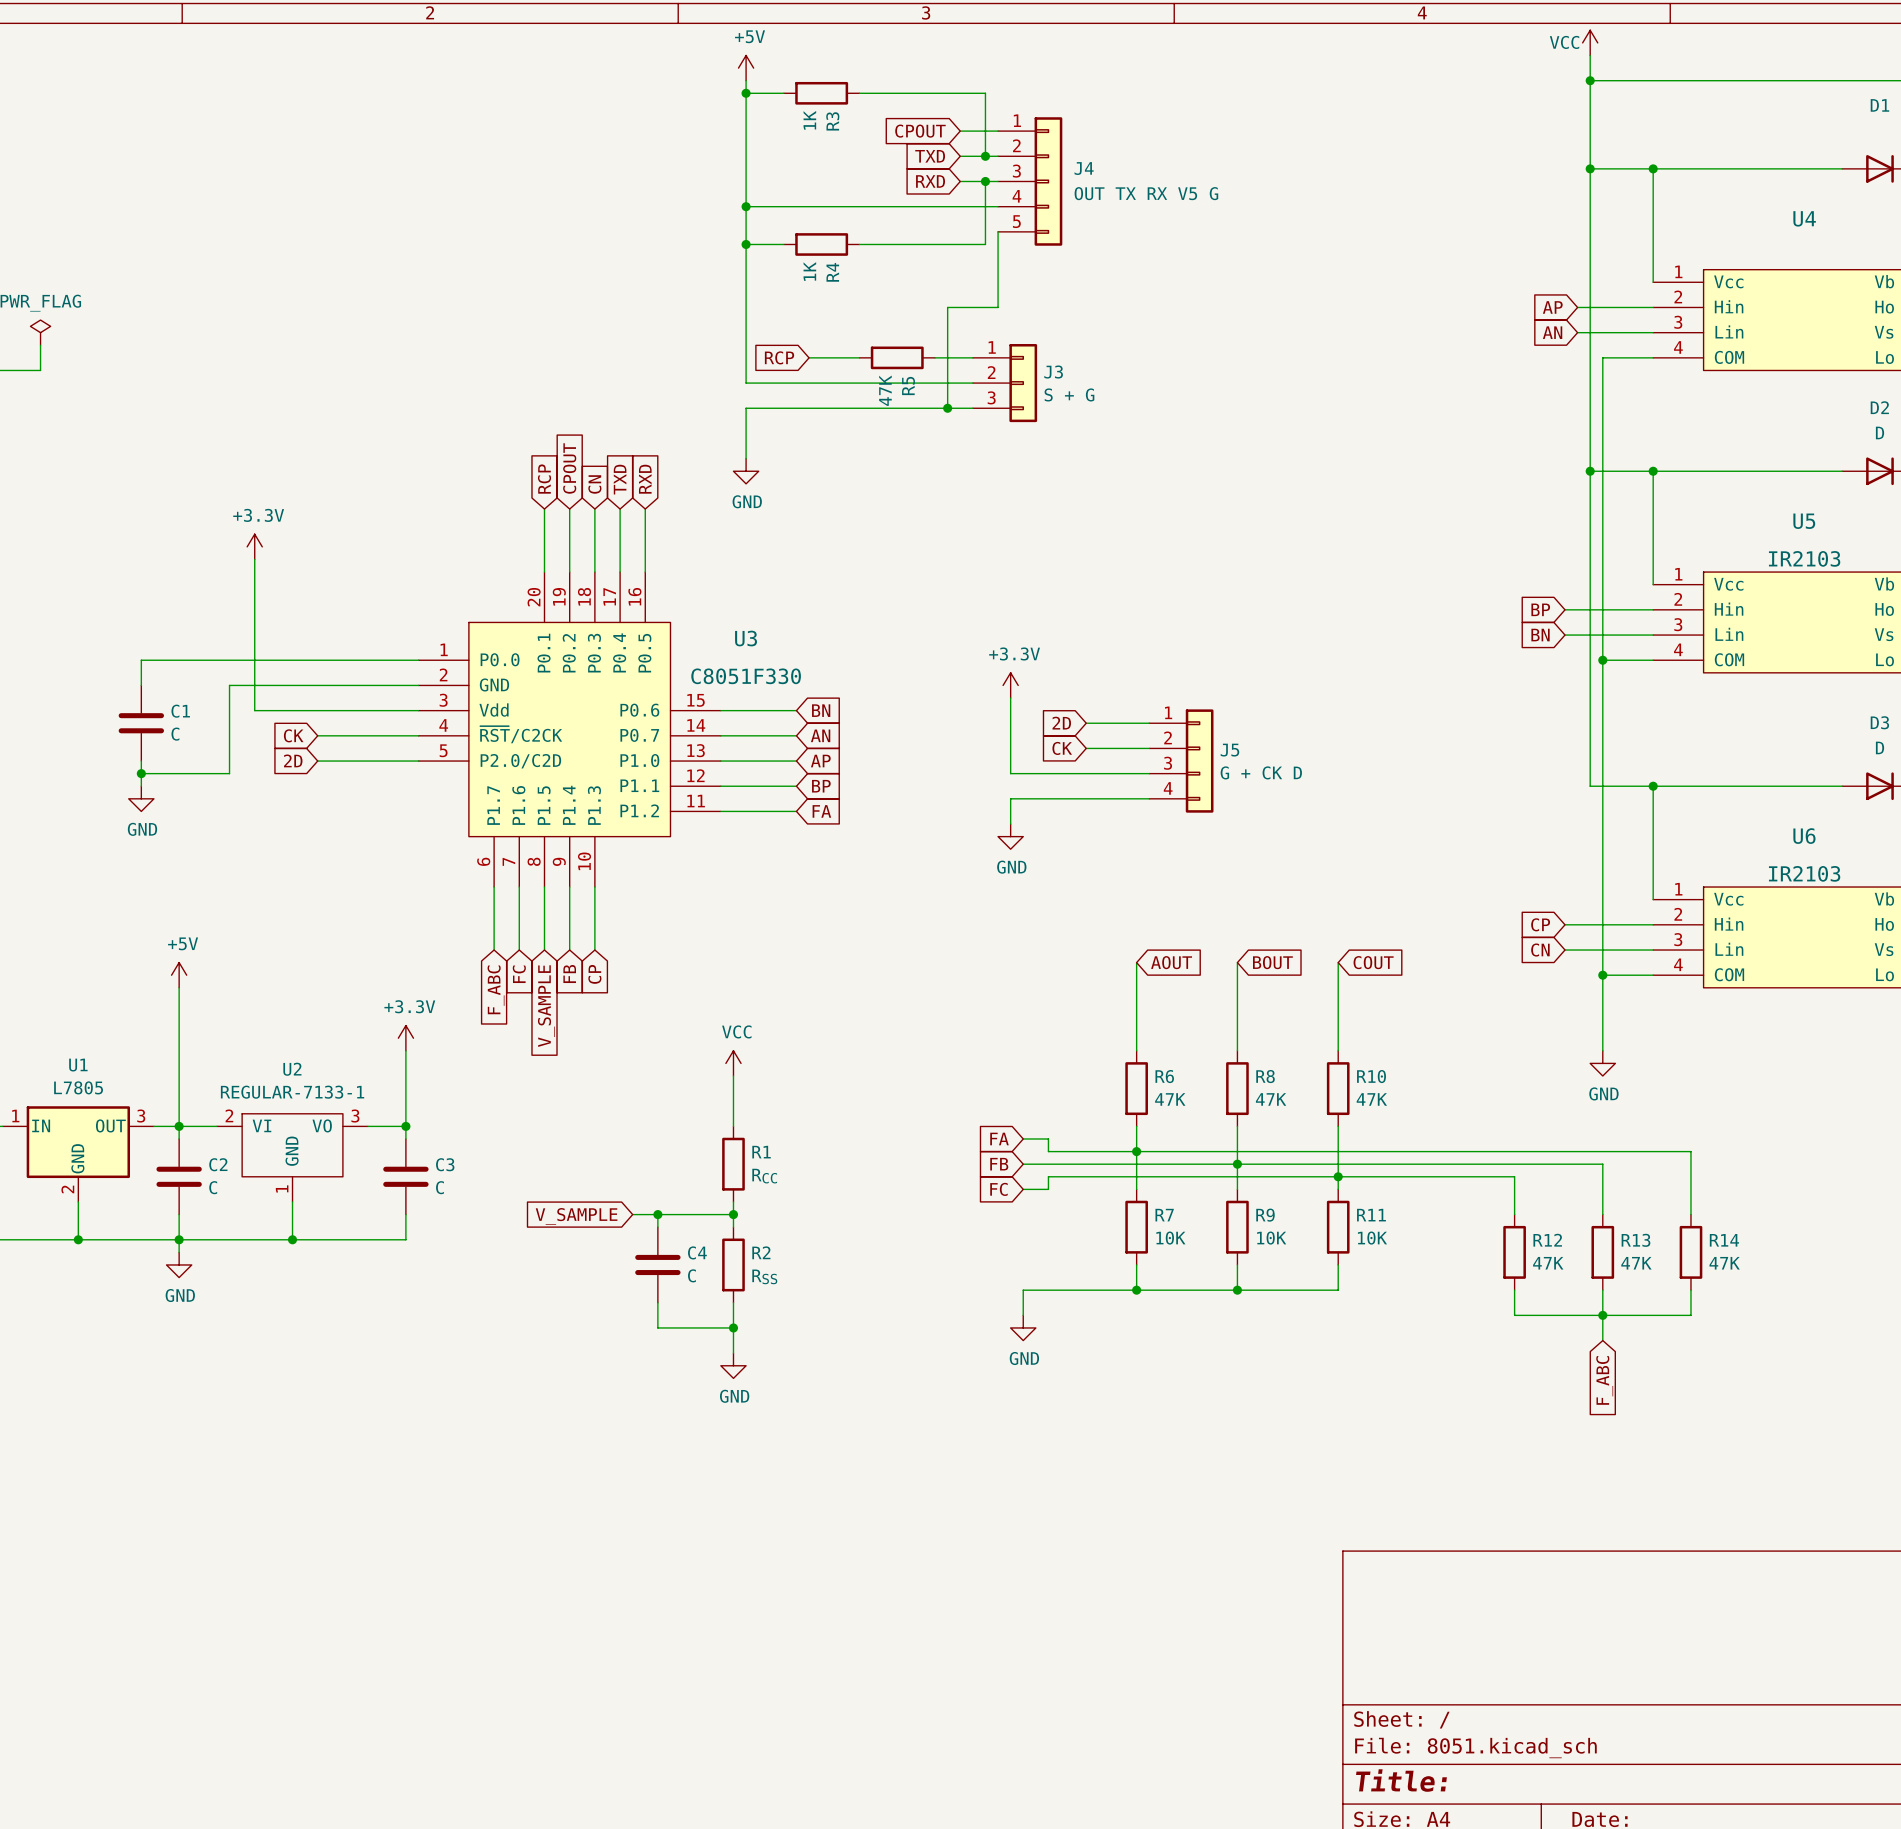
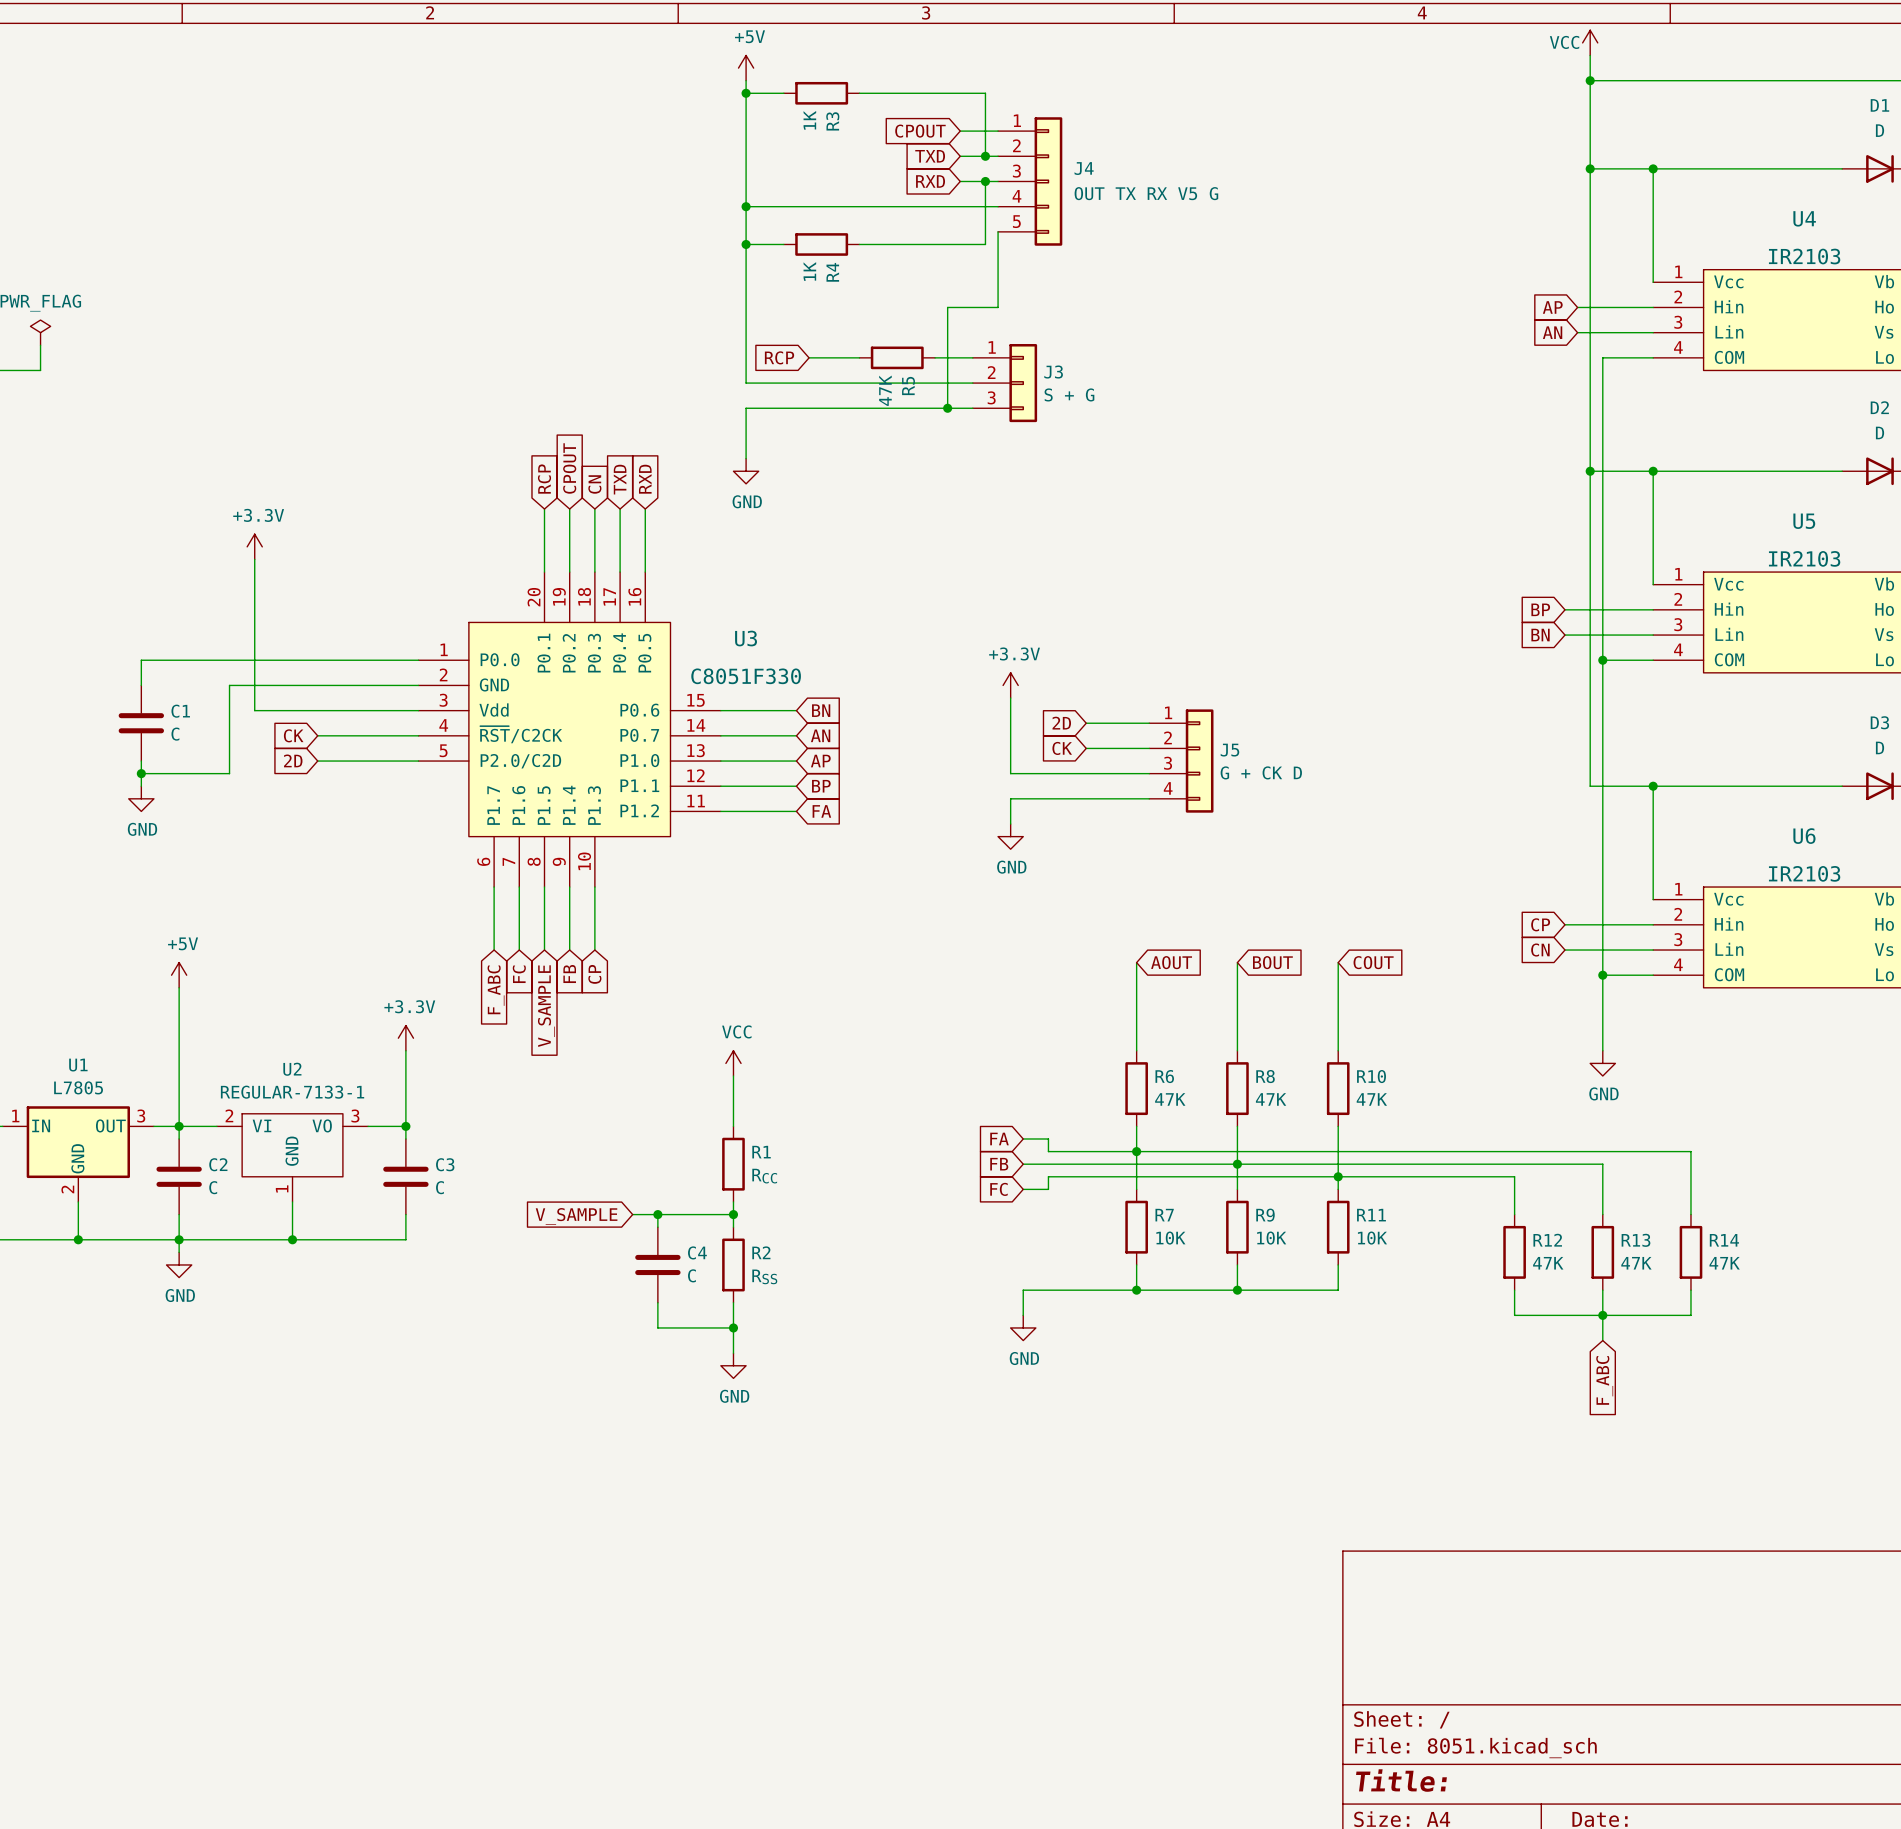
D1 value: none -> D (1880, 130)
U4 value: none -> IR2103 (1804, 256)

